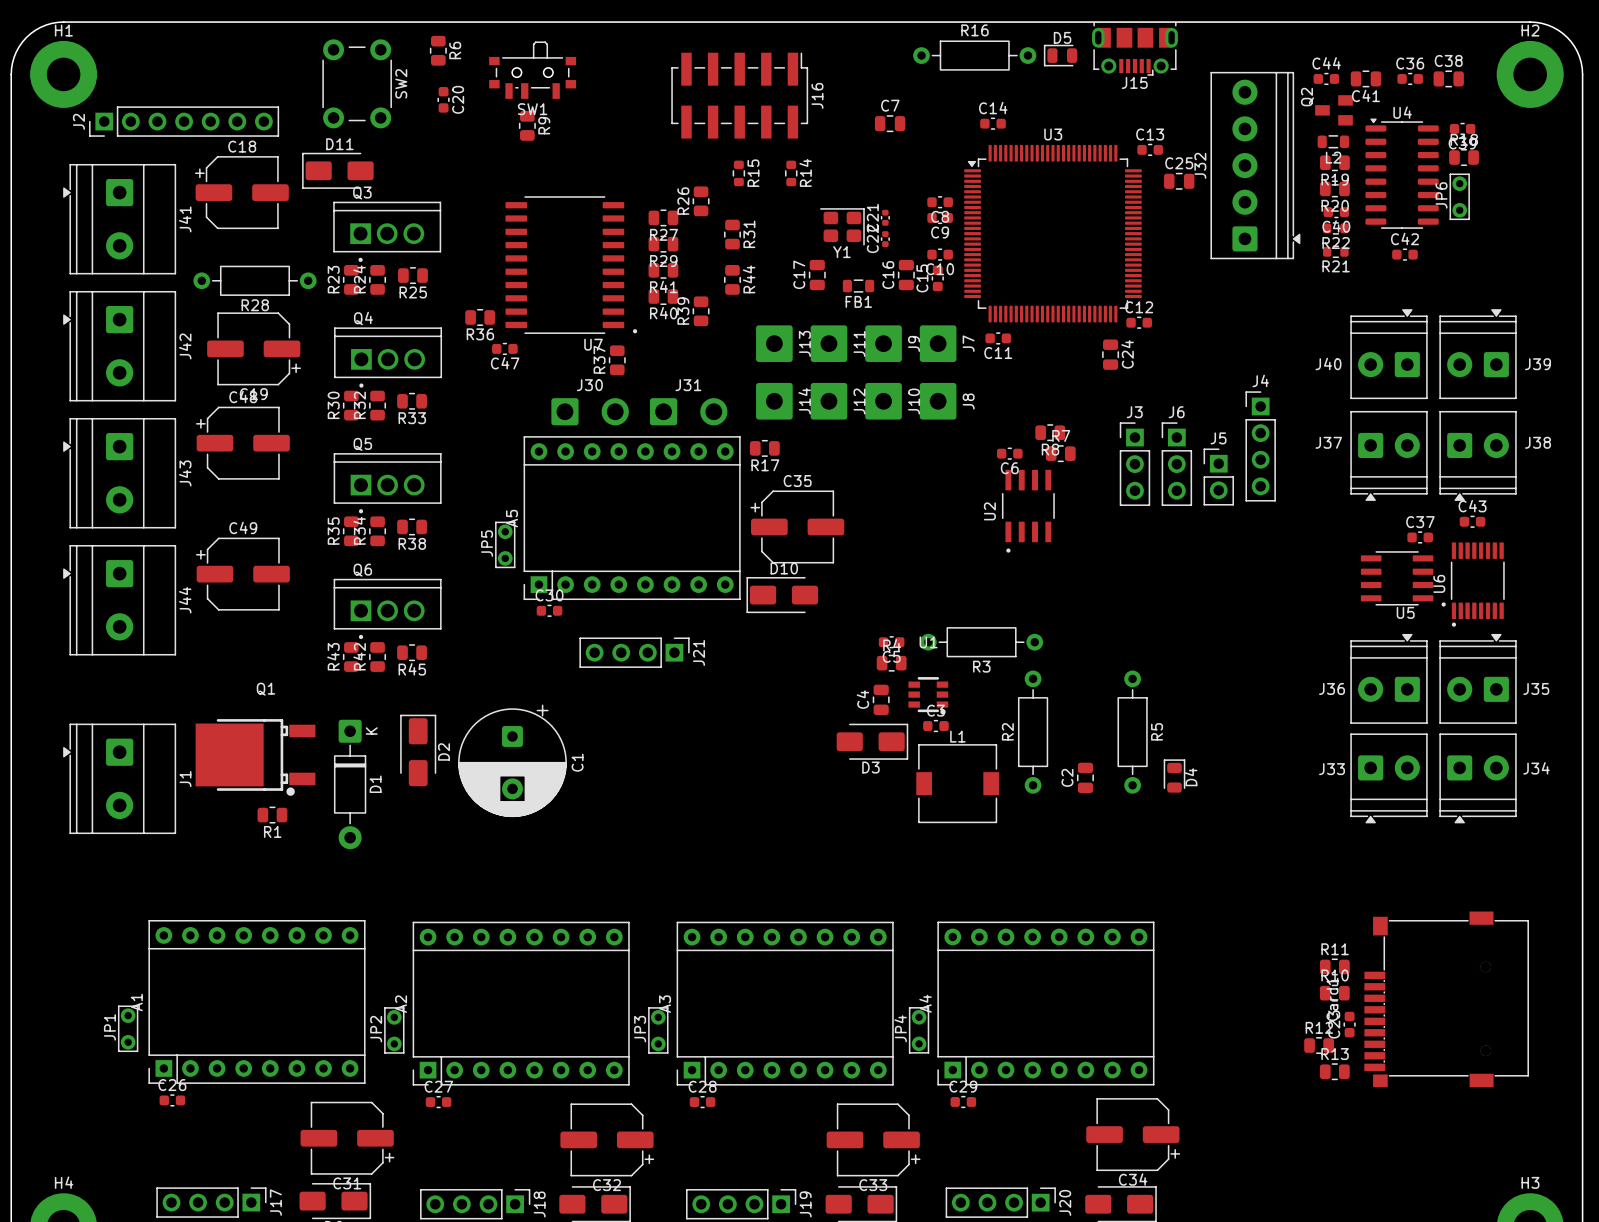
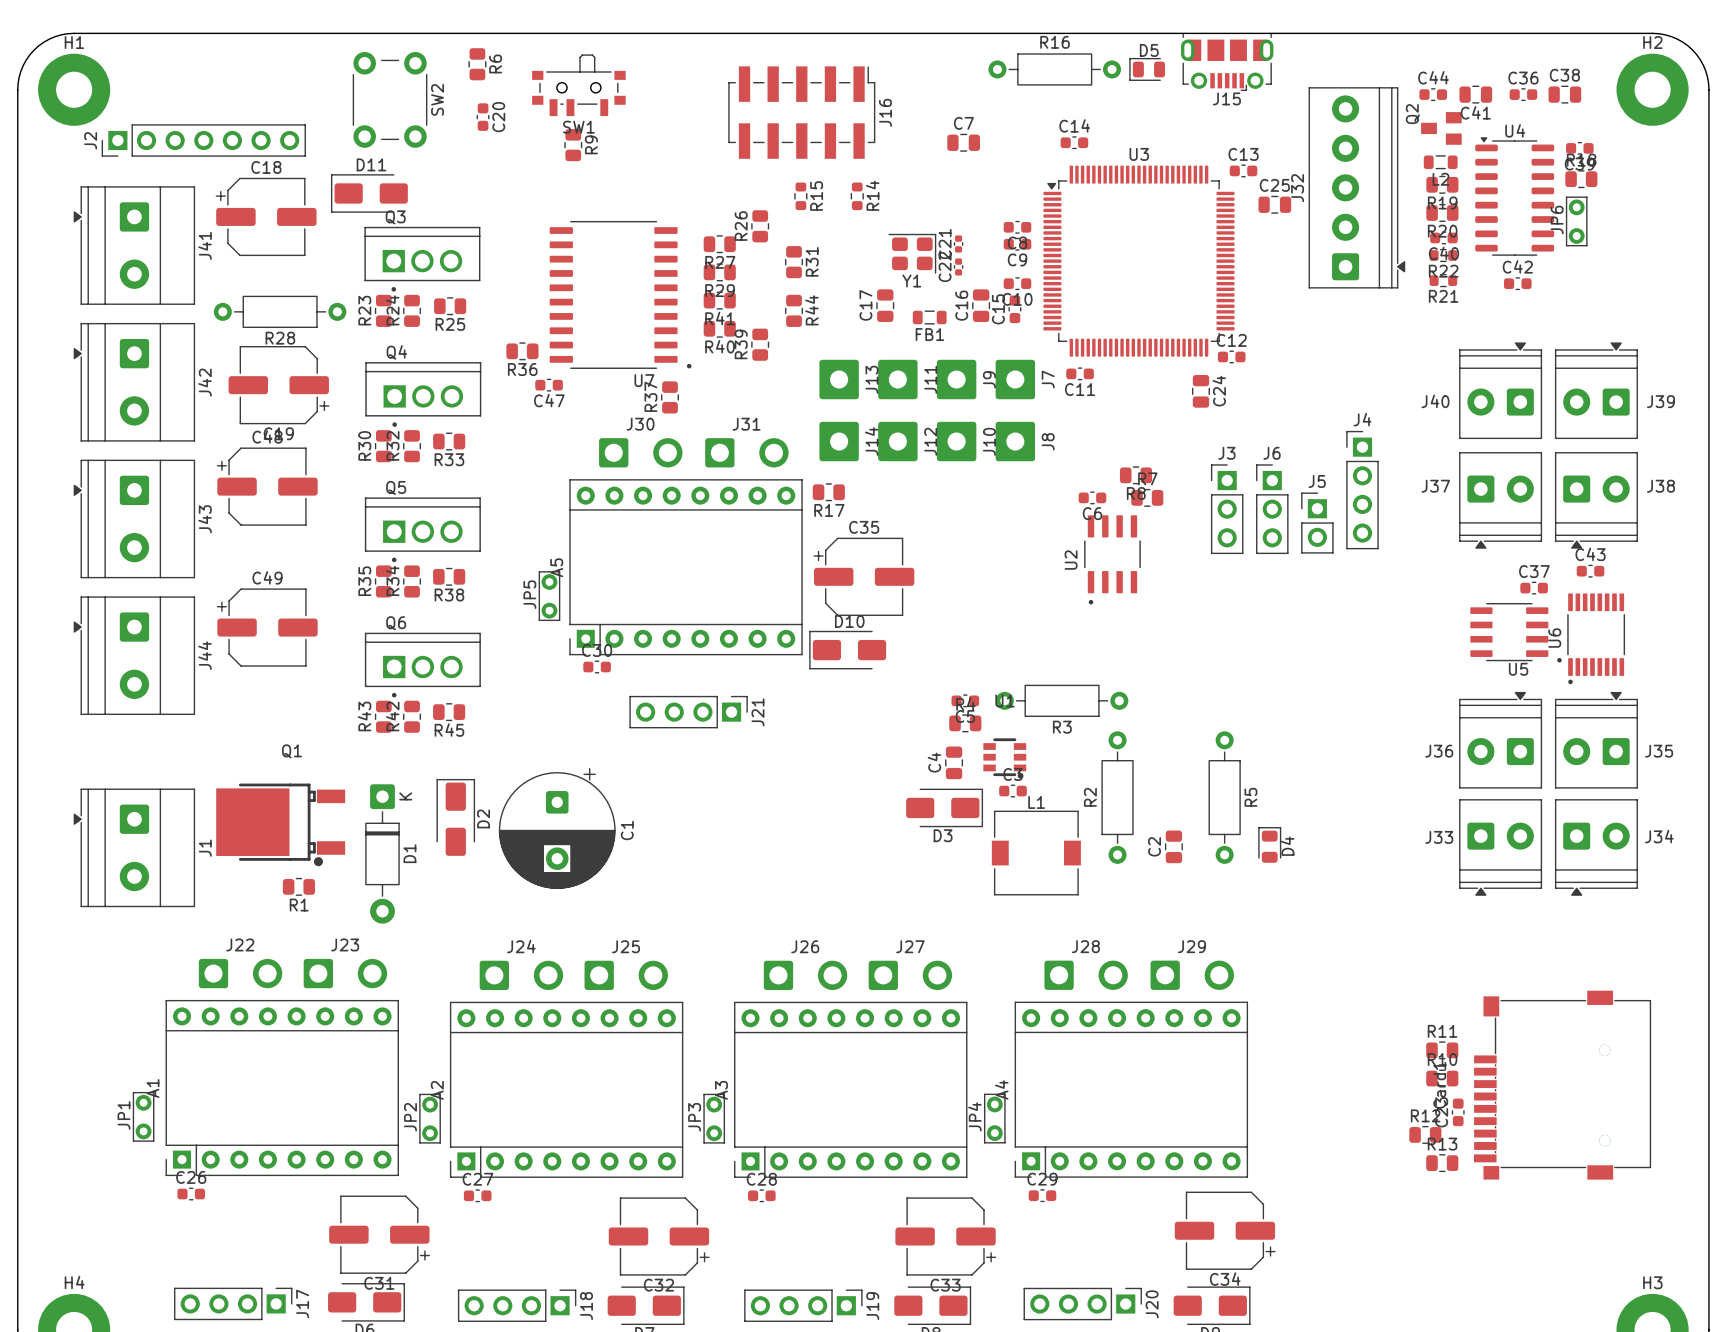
J22: none -> (240, 973)
J23: none -> (345, 973)
J24: none -> (521, 975)
J25: none -> (626, 975)
J26: none -> (805, 975)
J27: none -> (910, 975)
J28: none -> (1086, 975)
J29: none -> (1192, 975)

